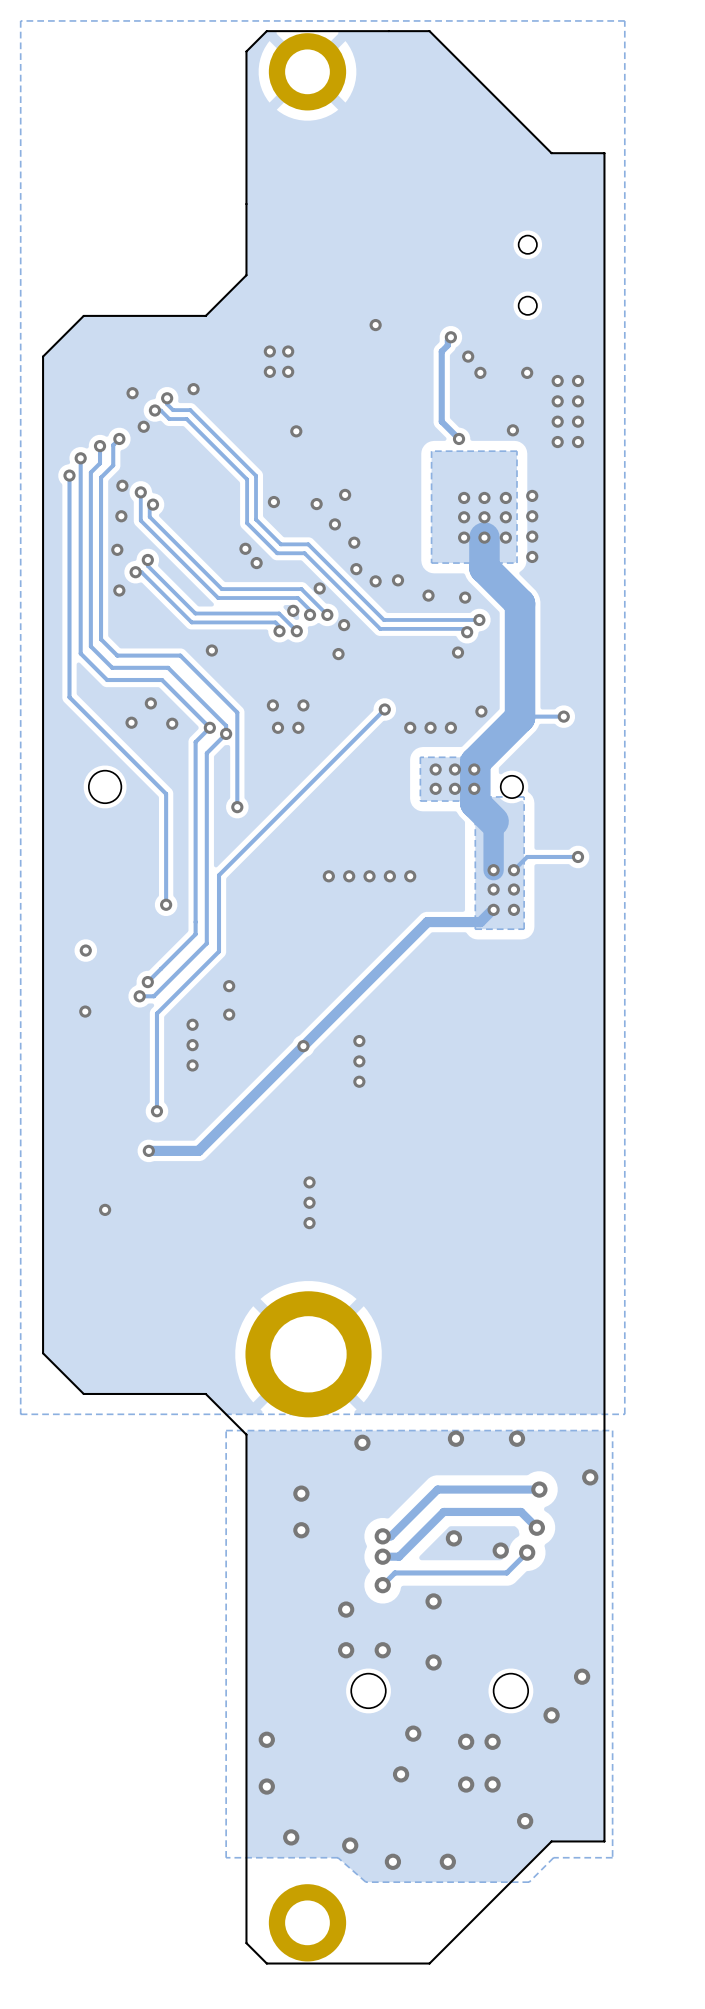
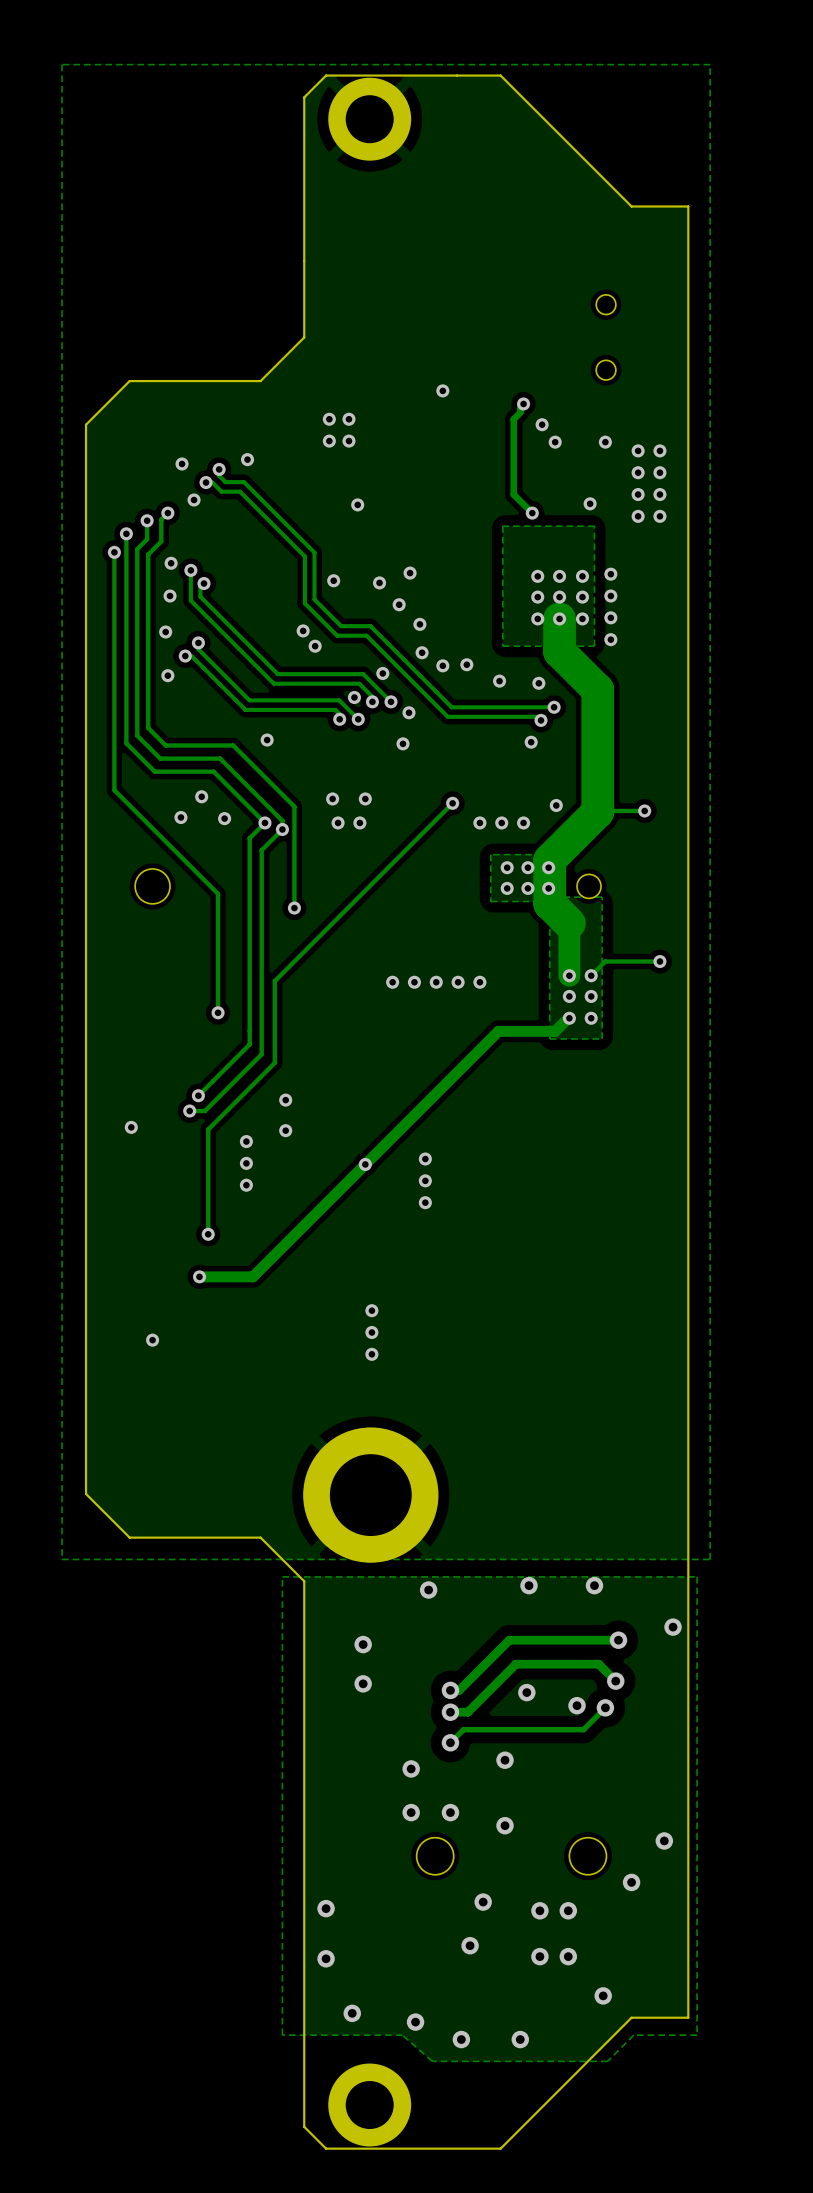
via: (85, 950) -> none

